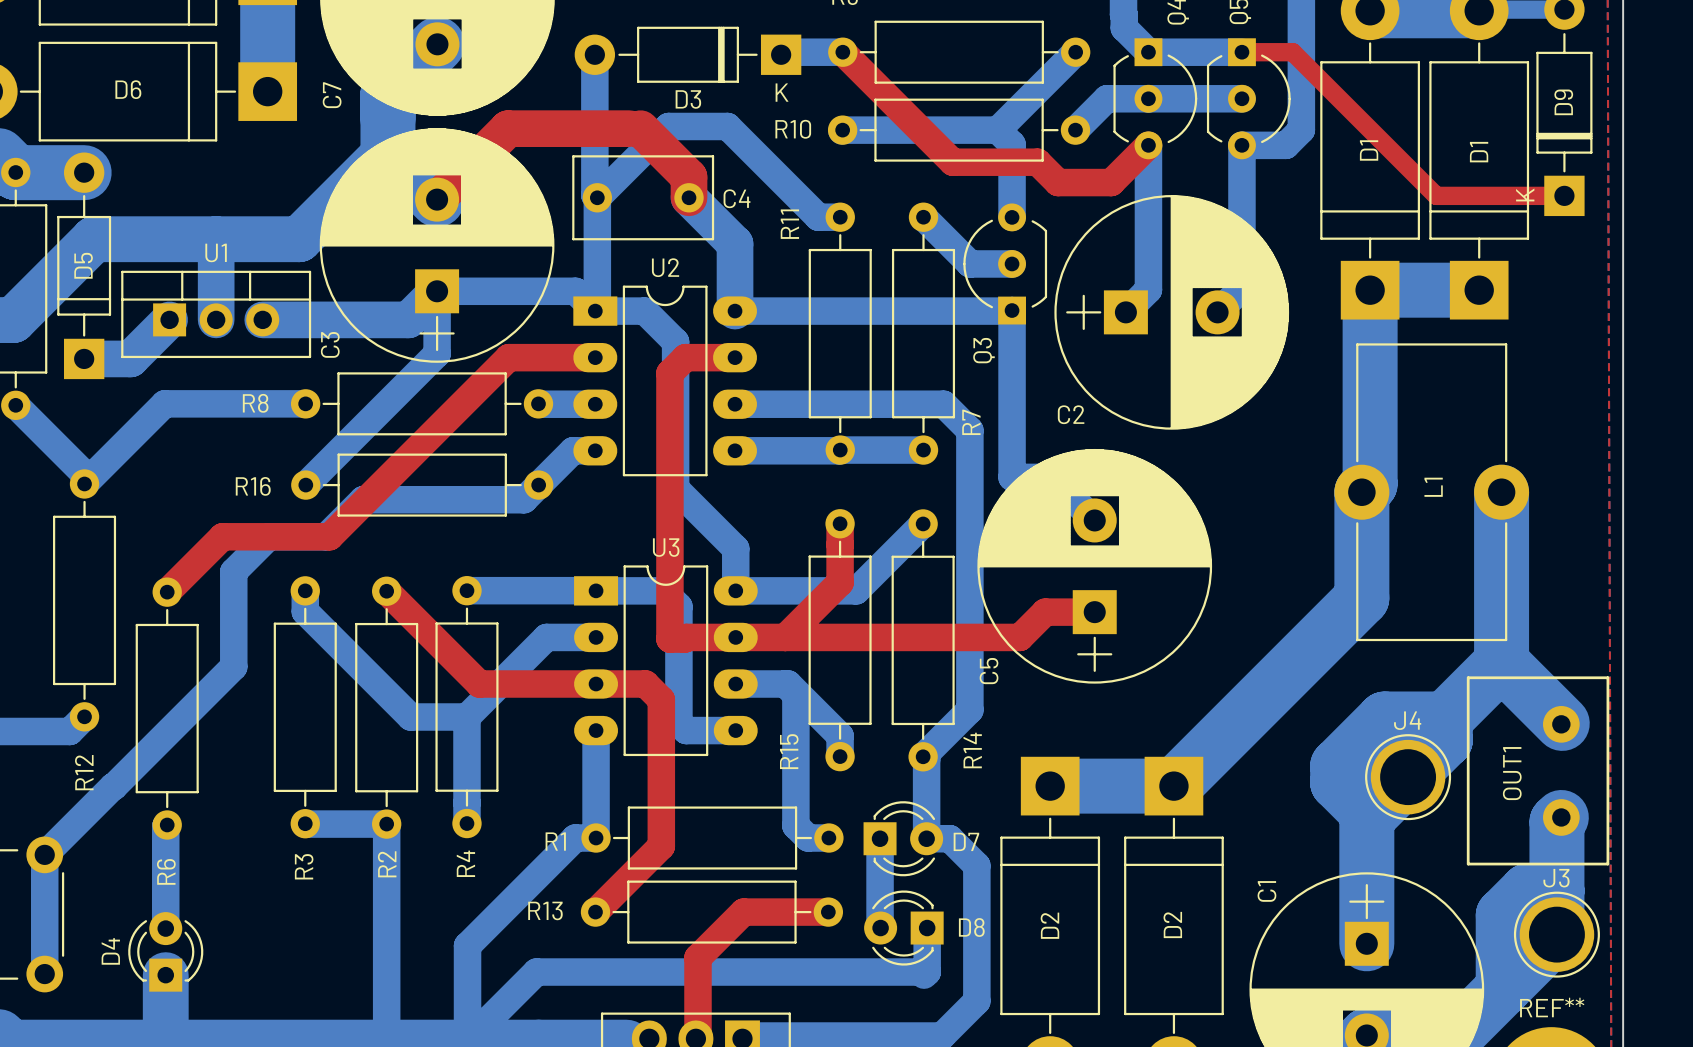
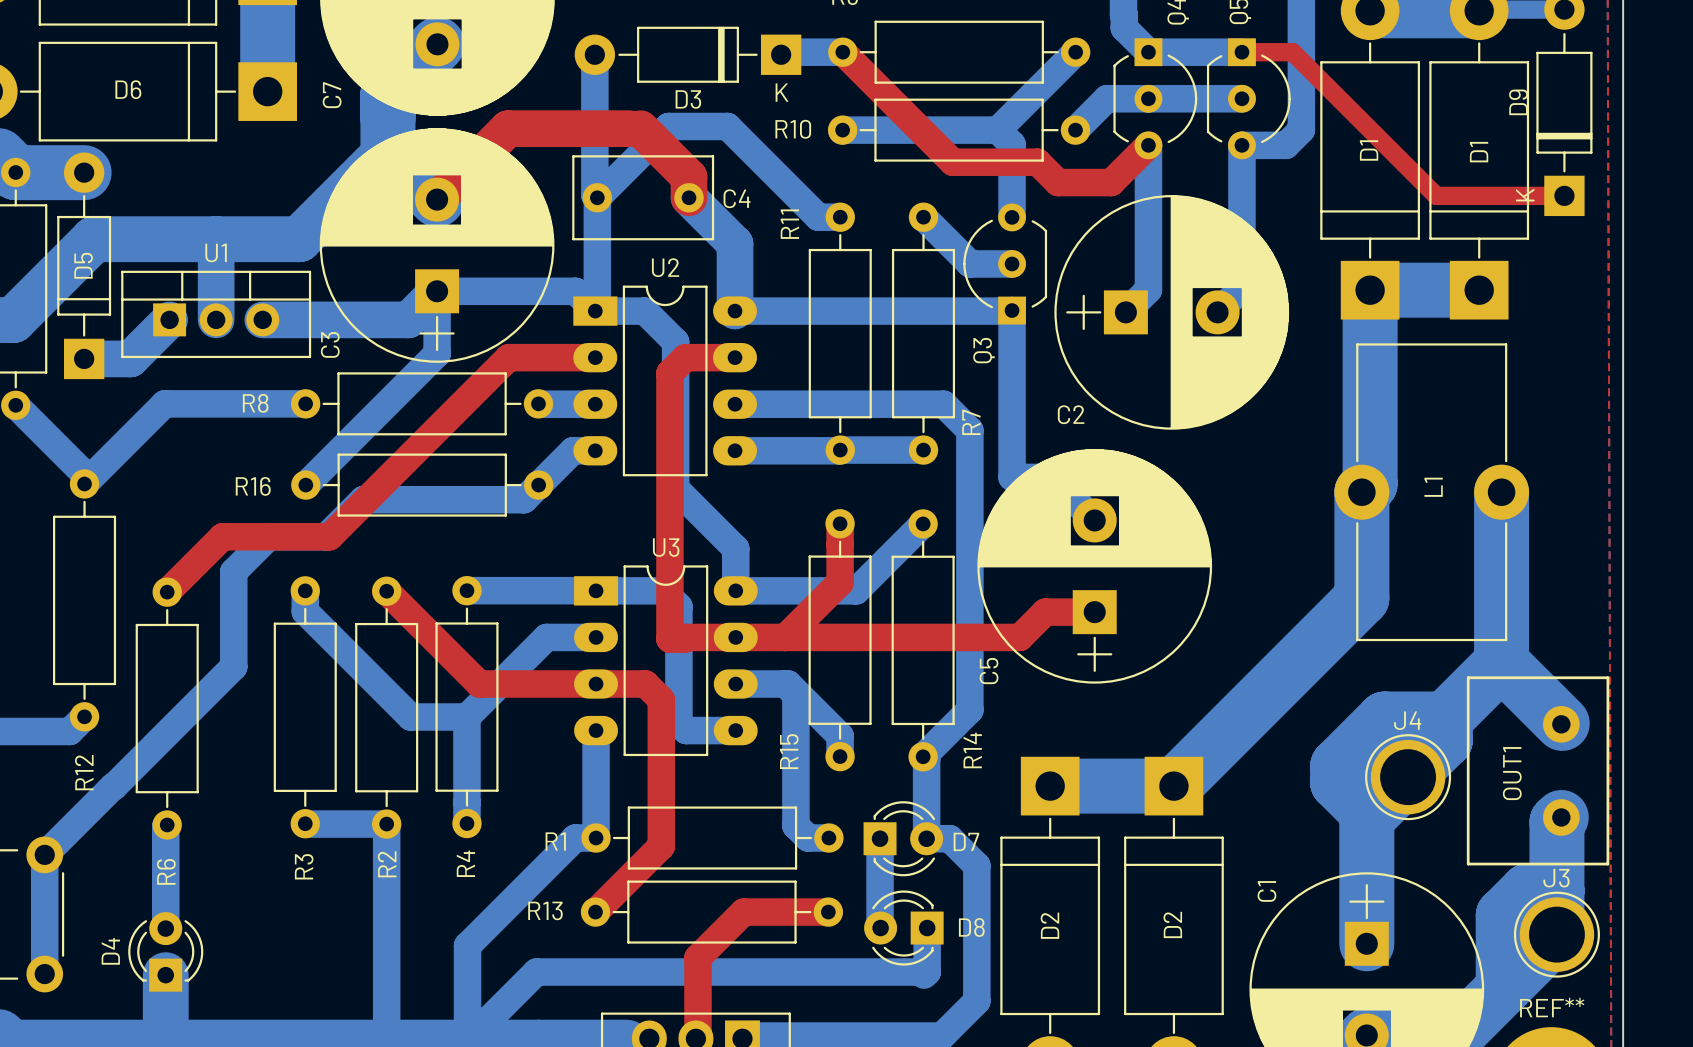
D9 name position: D9 (1563, 102) -> D9 (1518, 102)

